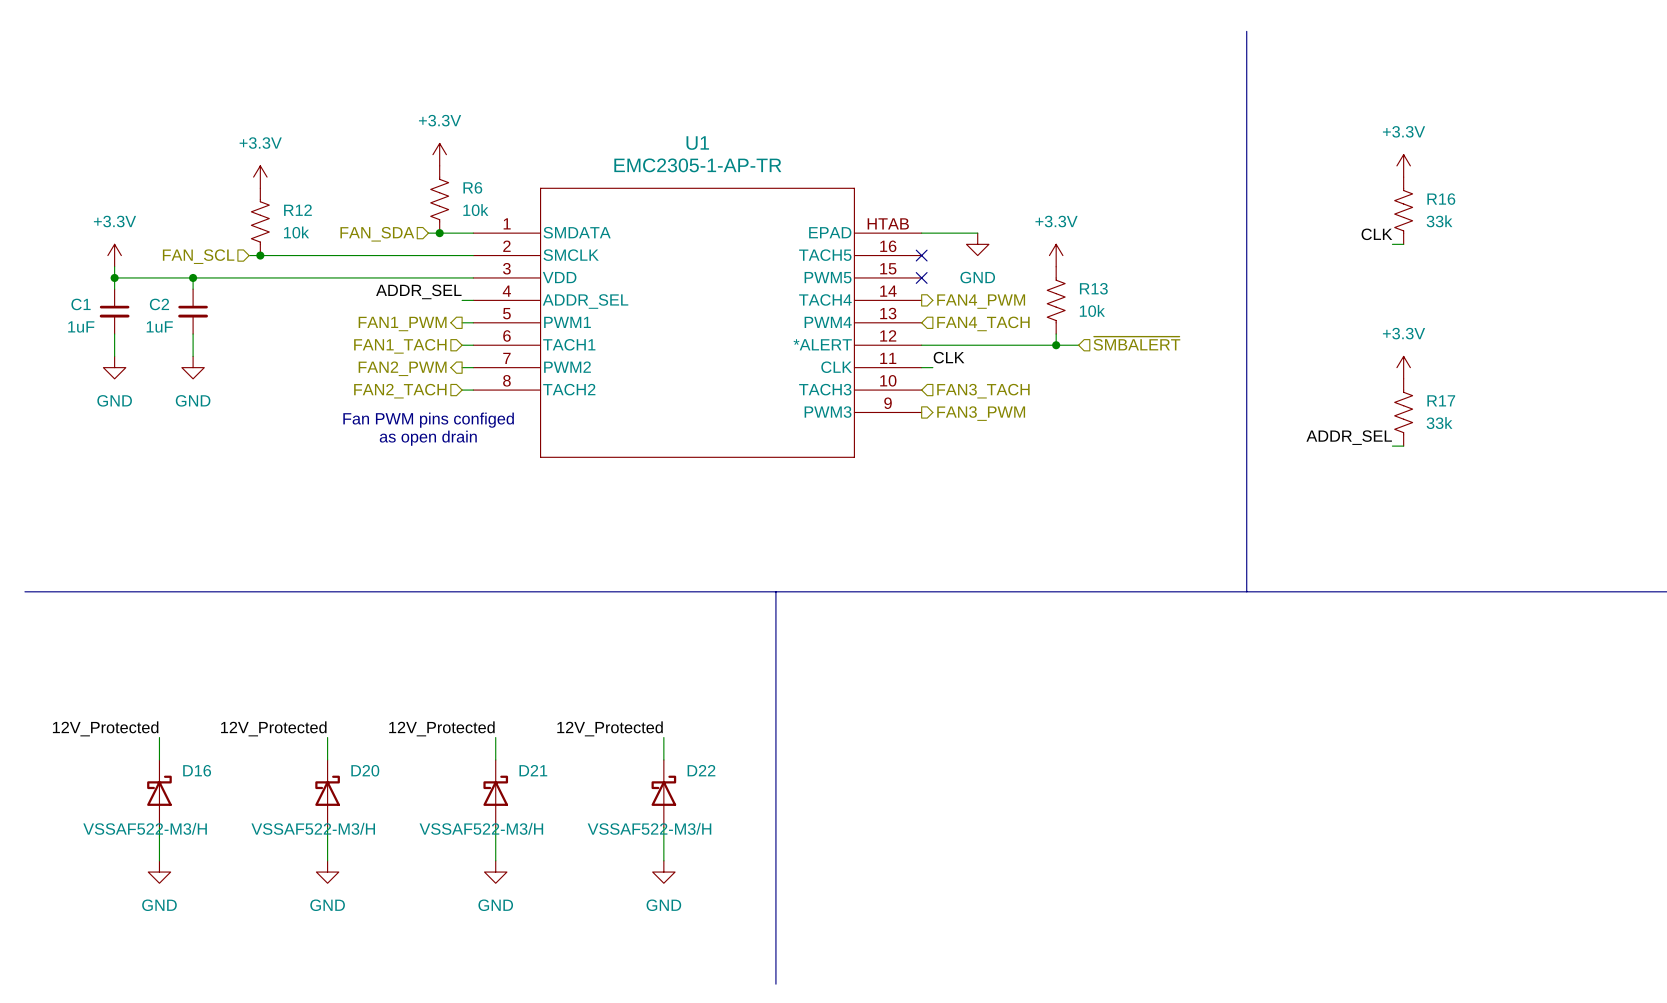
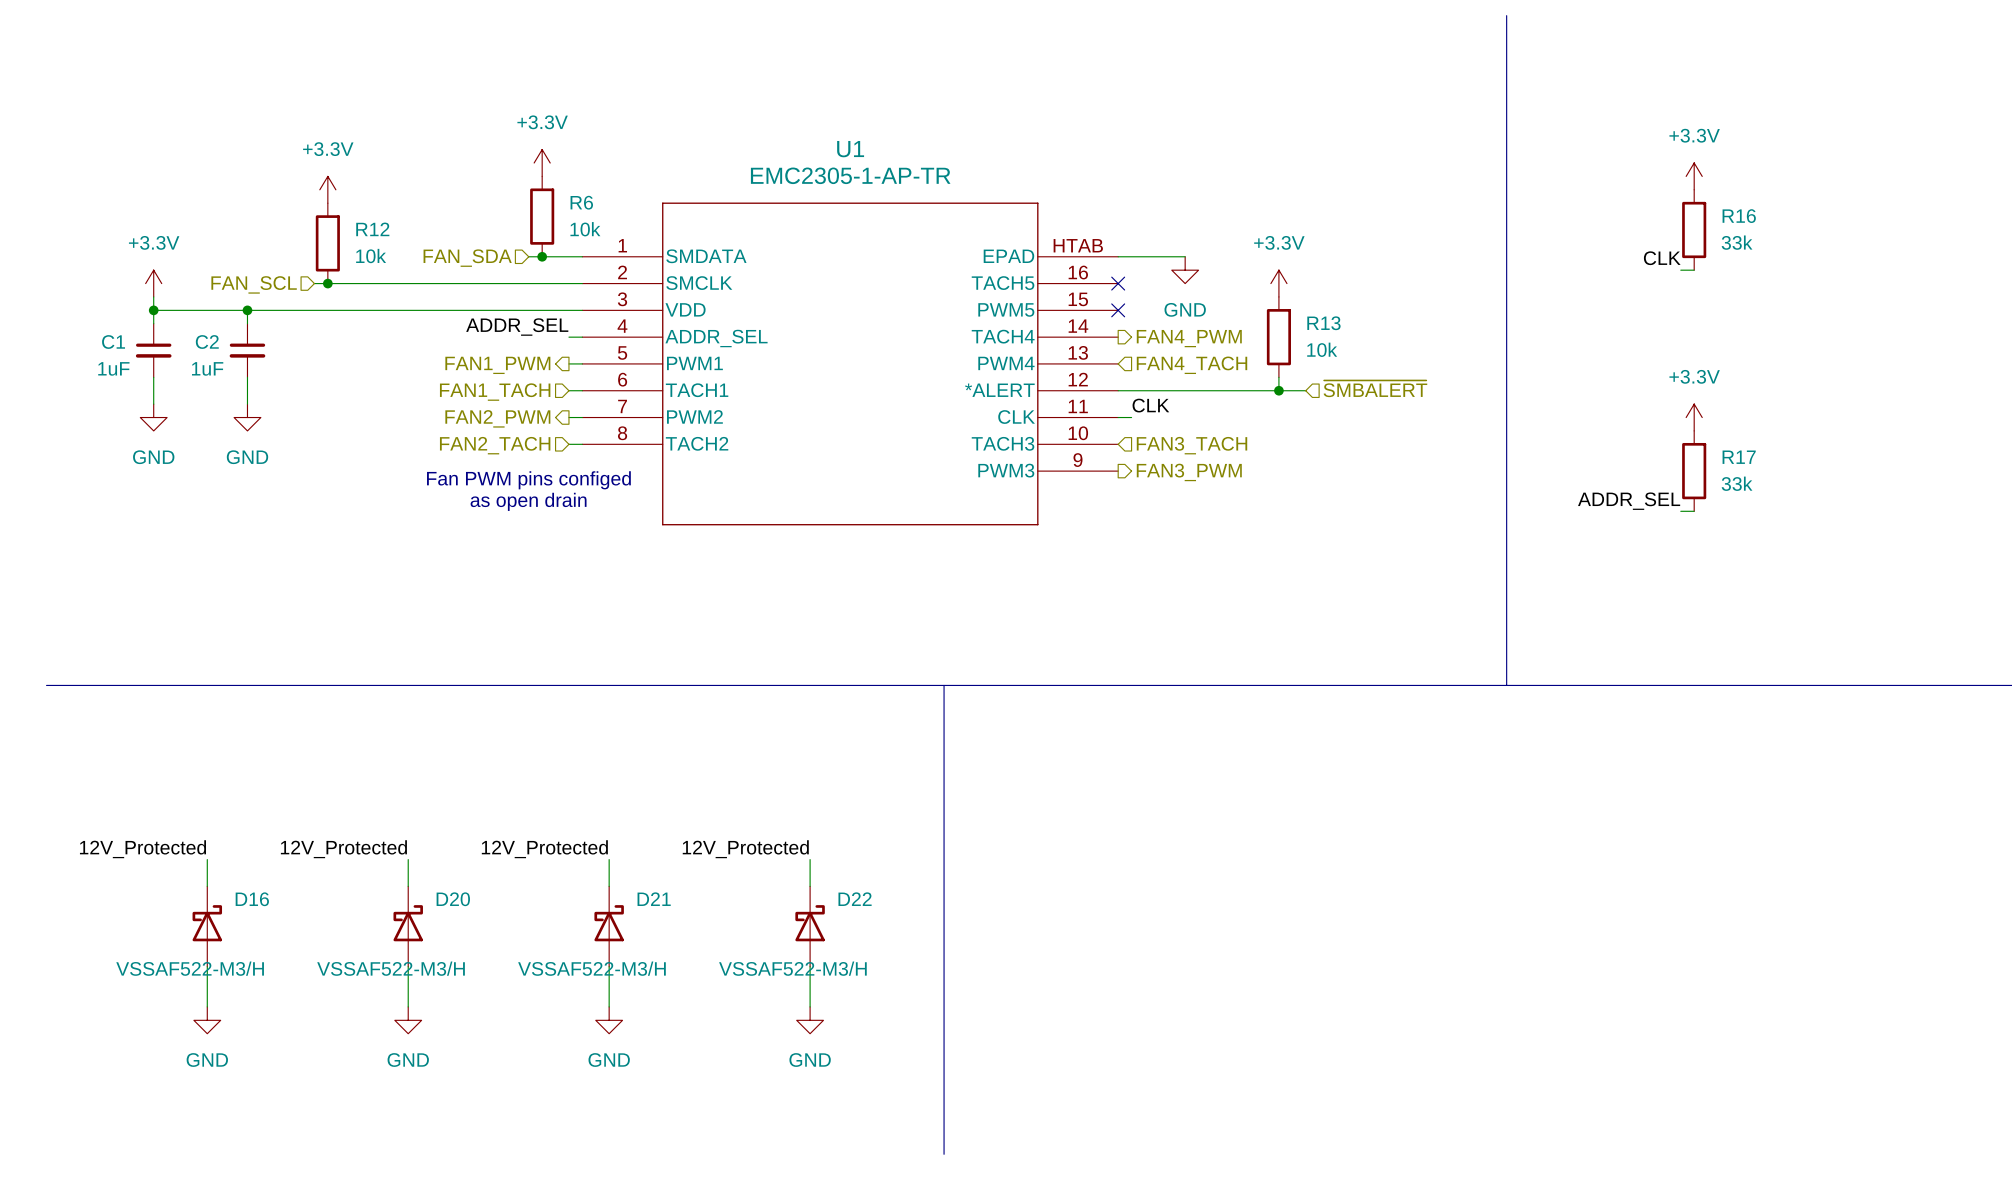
R6 symbol: [430, 165, 449, 234] -> [530, 176, 555, 257]
R16 symbol: [1394, 177, 1413, 245] -> [1682, 189, 1707, 271]
R12 symbol: [251, 188, 270, 256] -> [315, 203, 340, 284]
R13 symbol: [1047, 266, 1066, 335] -> [1266, 296, 1291, 378]
R17 symbol: [1394, 378, 1413, 447] -> [1682, 430, 1707, 512]

